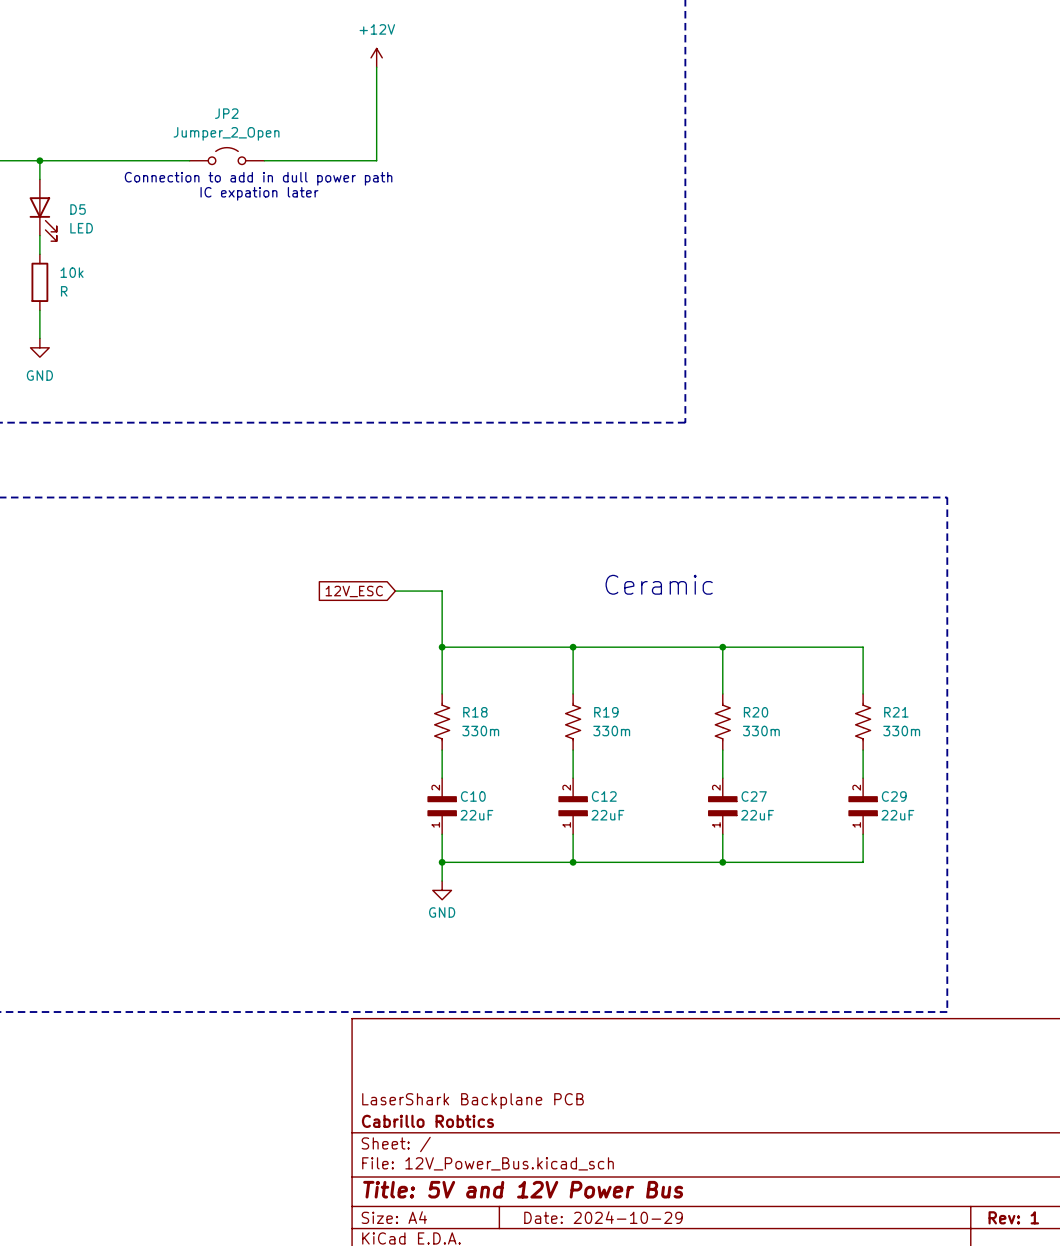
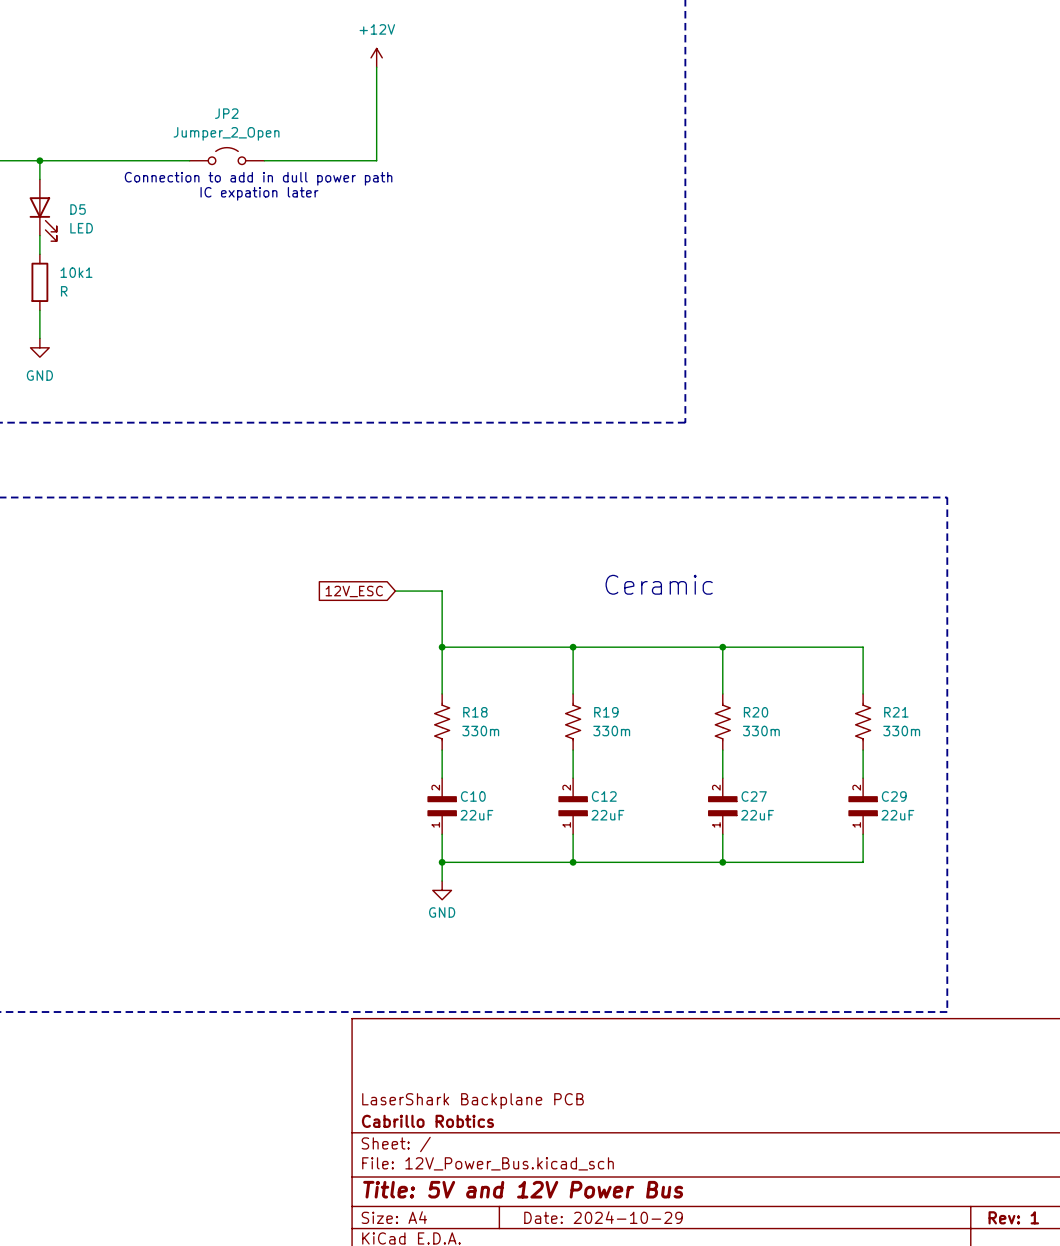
10k name: 10k (72, 272) -> 10k1 (76, 272)

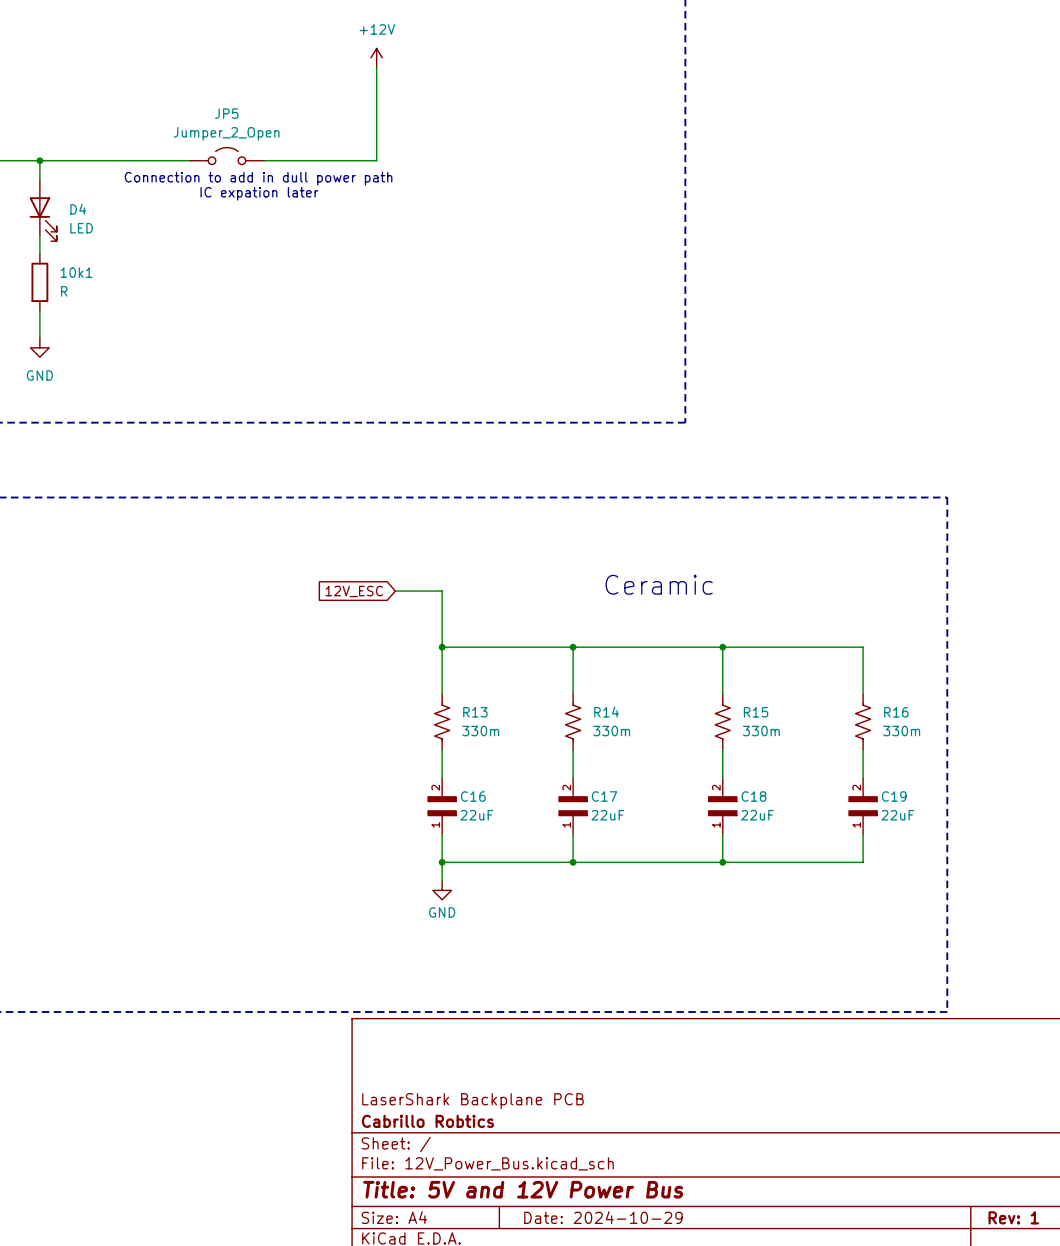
JP2 name: JP2 (226, 113) -> JP5 (226, 113)
D5 name: D5 (78, 209) -> D4 (78, 209)
R18 name: R18 (475, 712) -> R13 (475, 712)
R19 name: R19 (606, 712) -> R14 (606, 712)
R20 name: R20 (756, 712) -> R15 (756, 712)
R21 name: R21 (896, 712) -> R16 (896, 712)
C10 name: C10 (473, 796) -> C16 (473, 796)
C12 name: C12 (604, 796) -> C17 (604, 796)
C27 name: C27 (754, 796) -> C18 (753, 796)
C29 name: C29 (894, 796) -> C19 (894, 796)

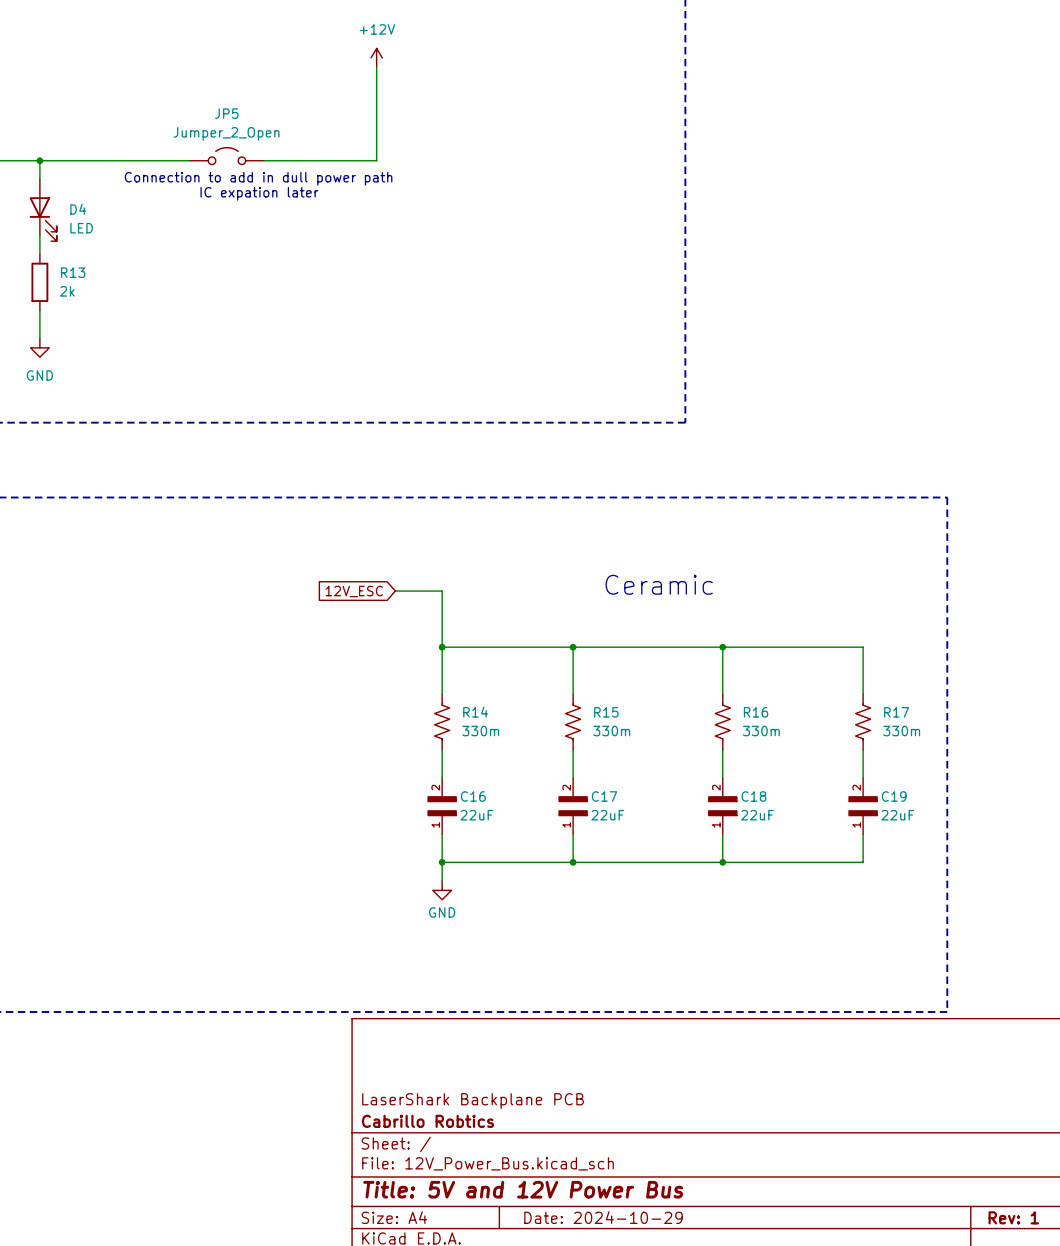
10k1 name: 10k1 (76, 272) -> R13 (73, 272)
10k1 value: R (64, 291) -> 2k (67, 291)
R13 name: R13 (475, 712) -> R14 (475, 712)
R14 name: R14 (606, 712) -> R15 (606, 712)
R15 name: R15 (756, 712) -> R16 (756, 712)
R16 name: R16 (896, 712) -> R17 (896, 712)

